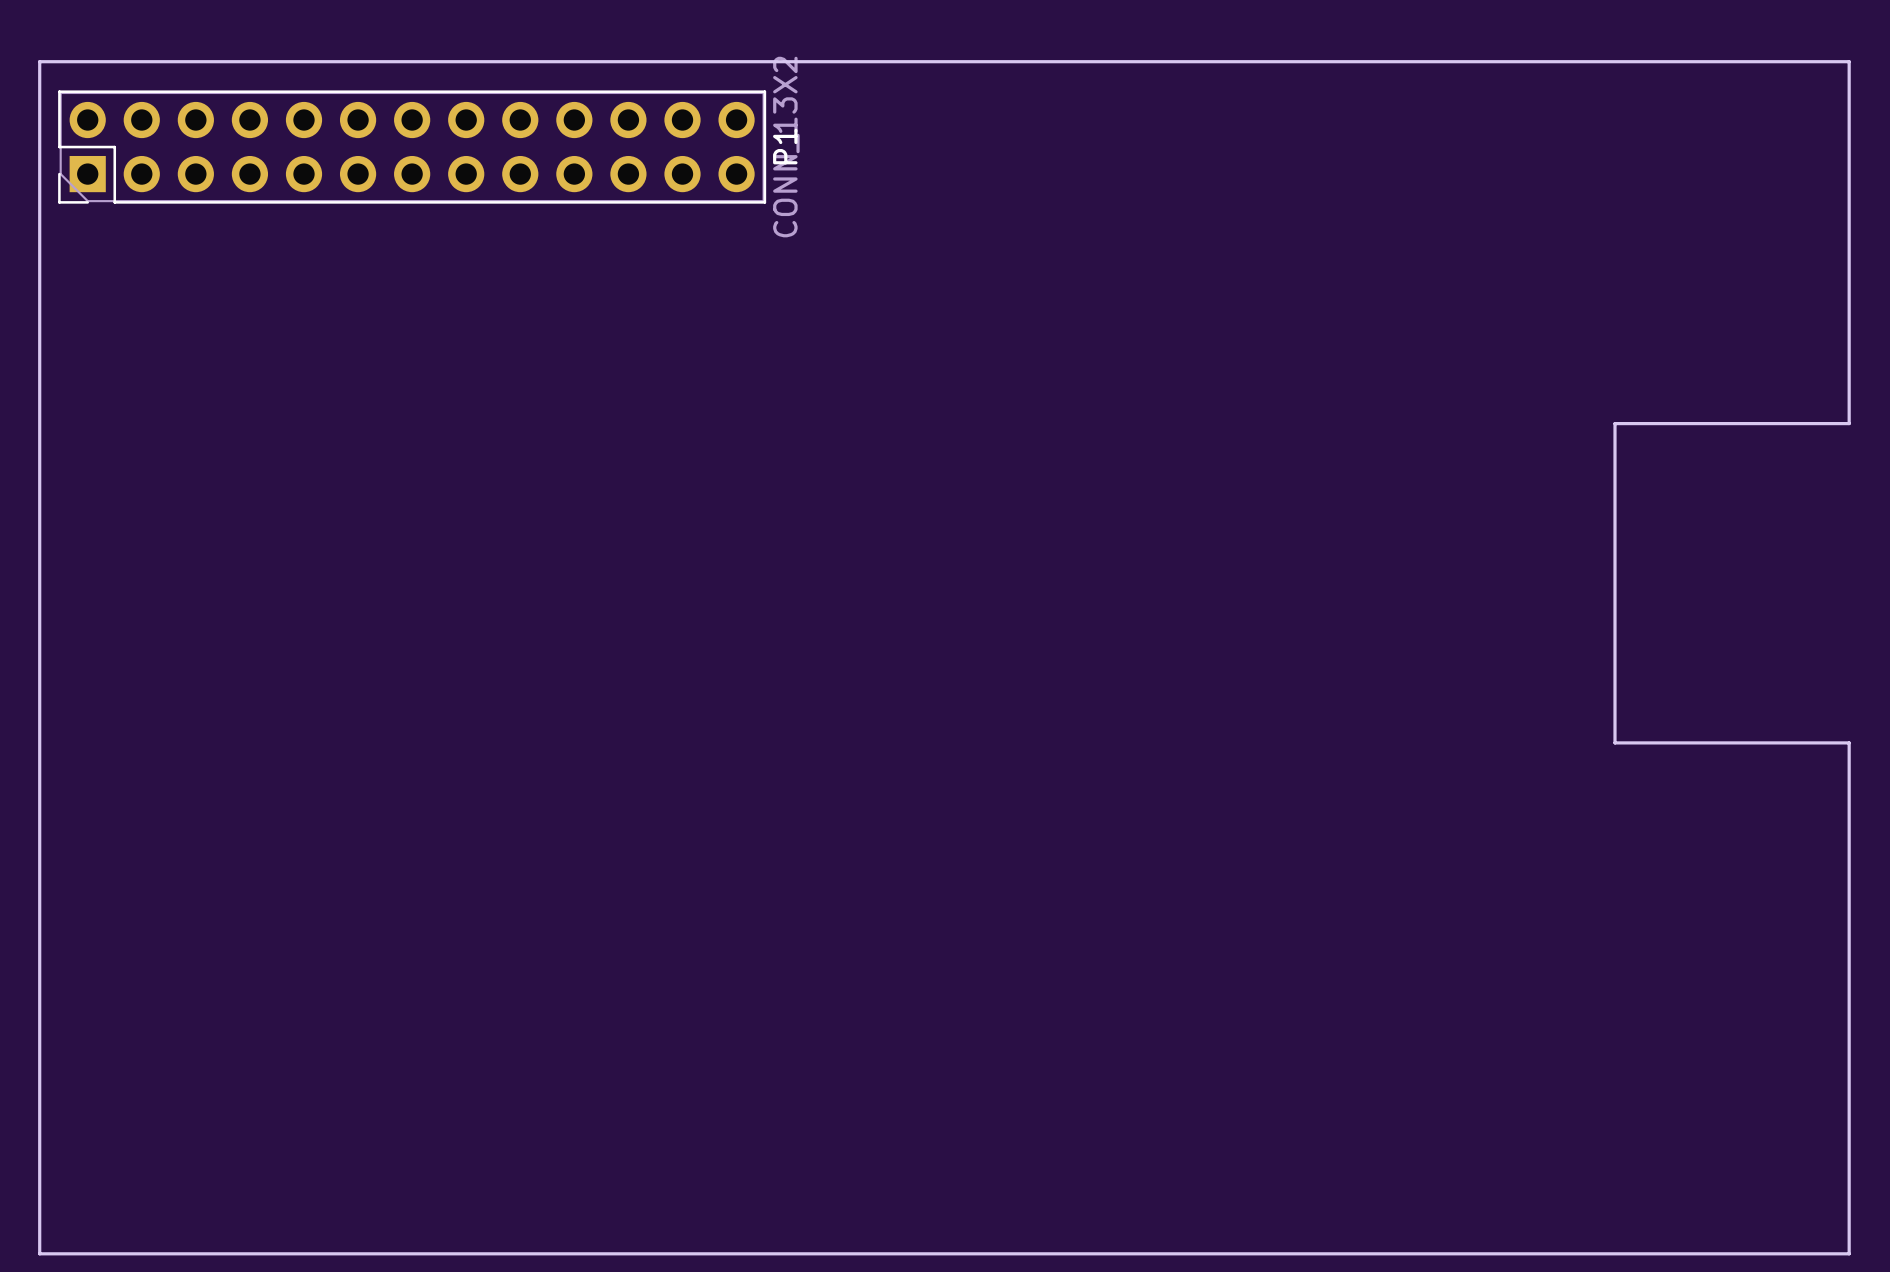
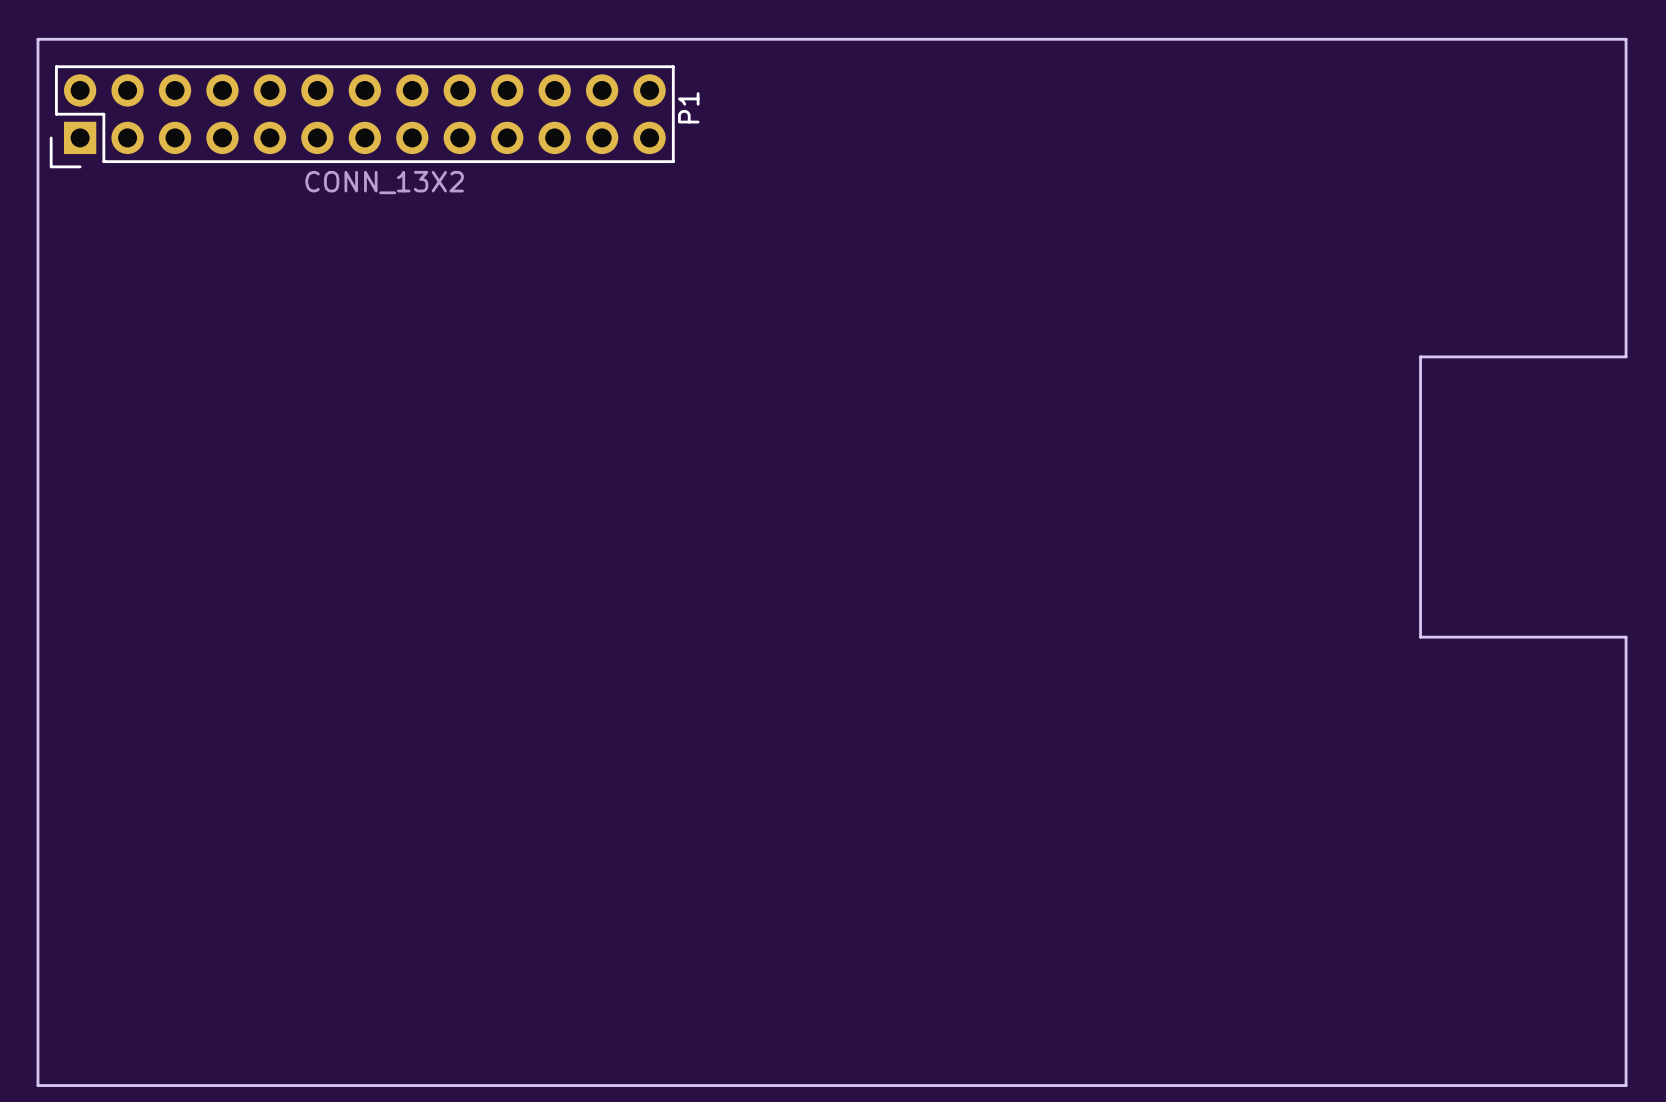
P1 footprint: [58, 90, 767, 204] -> [49, 65, 675, 169]
P1 value position: CONN_13X2 (786, 147) -> CONN_13X2 (384, 182)

